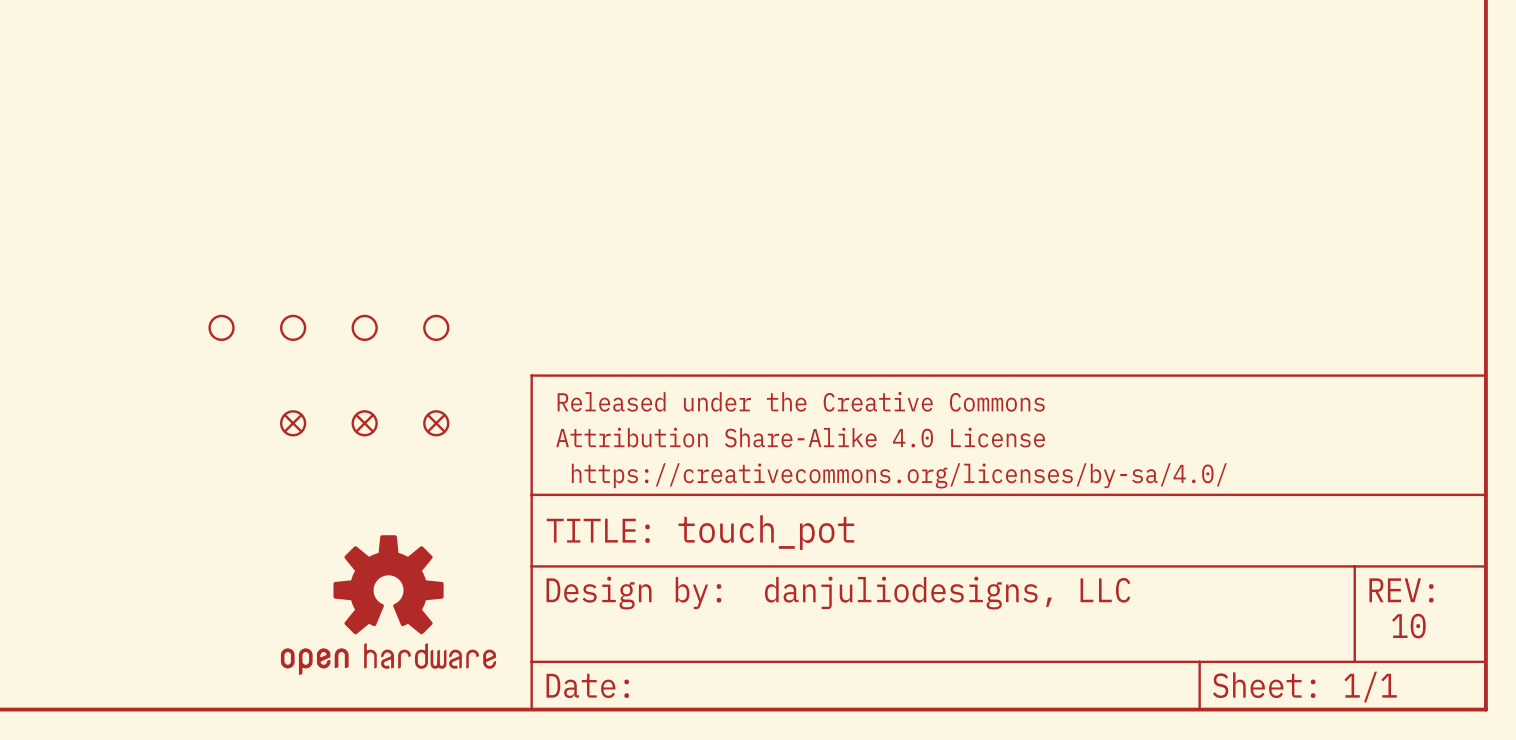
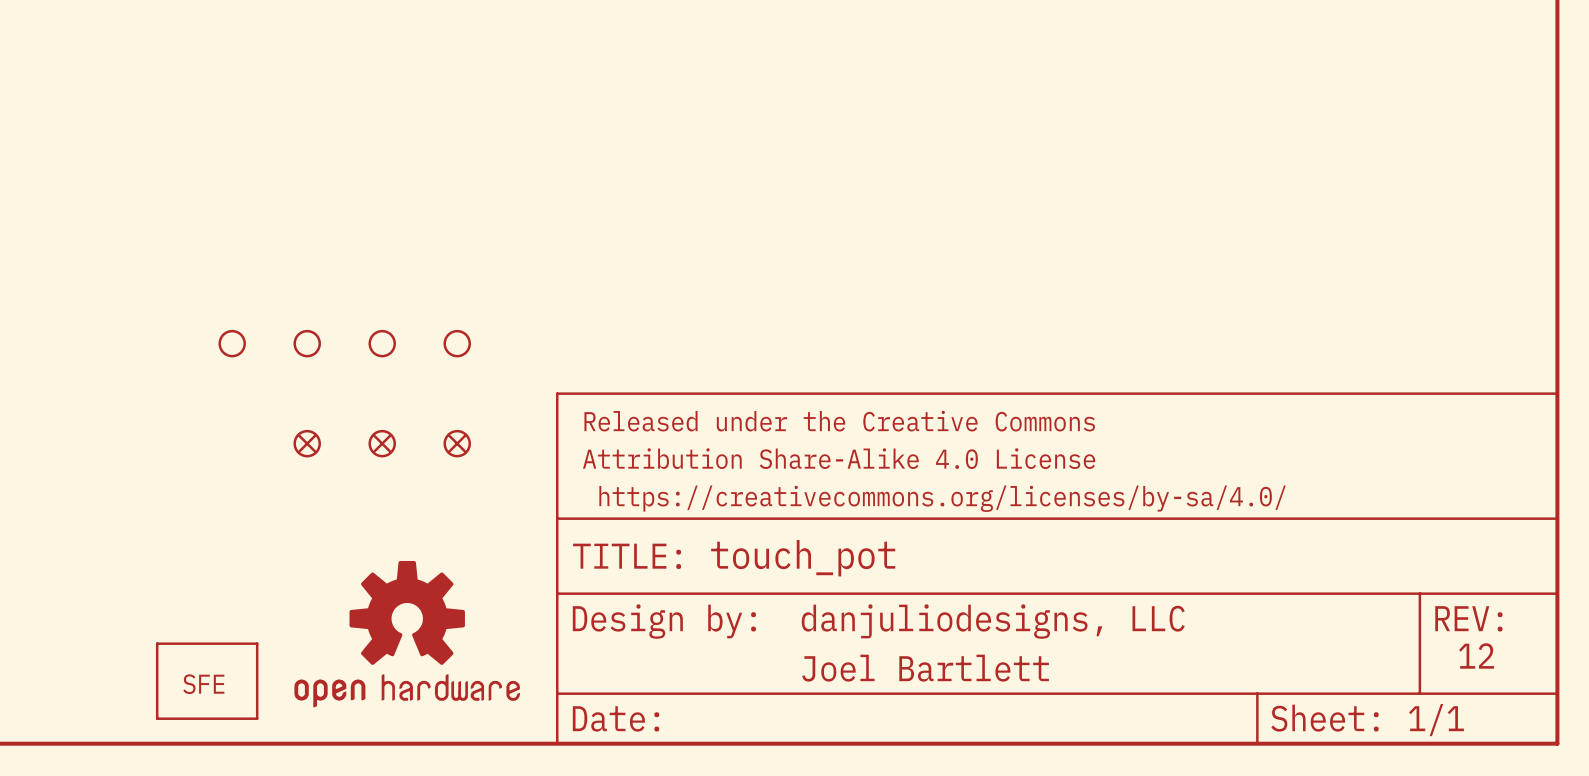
text: 10 (1408, 626) -> 12 (1476, 655)
text: none -> Joel Bartlett (925, 668)
part: none -> (207, 681)

